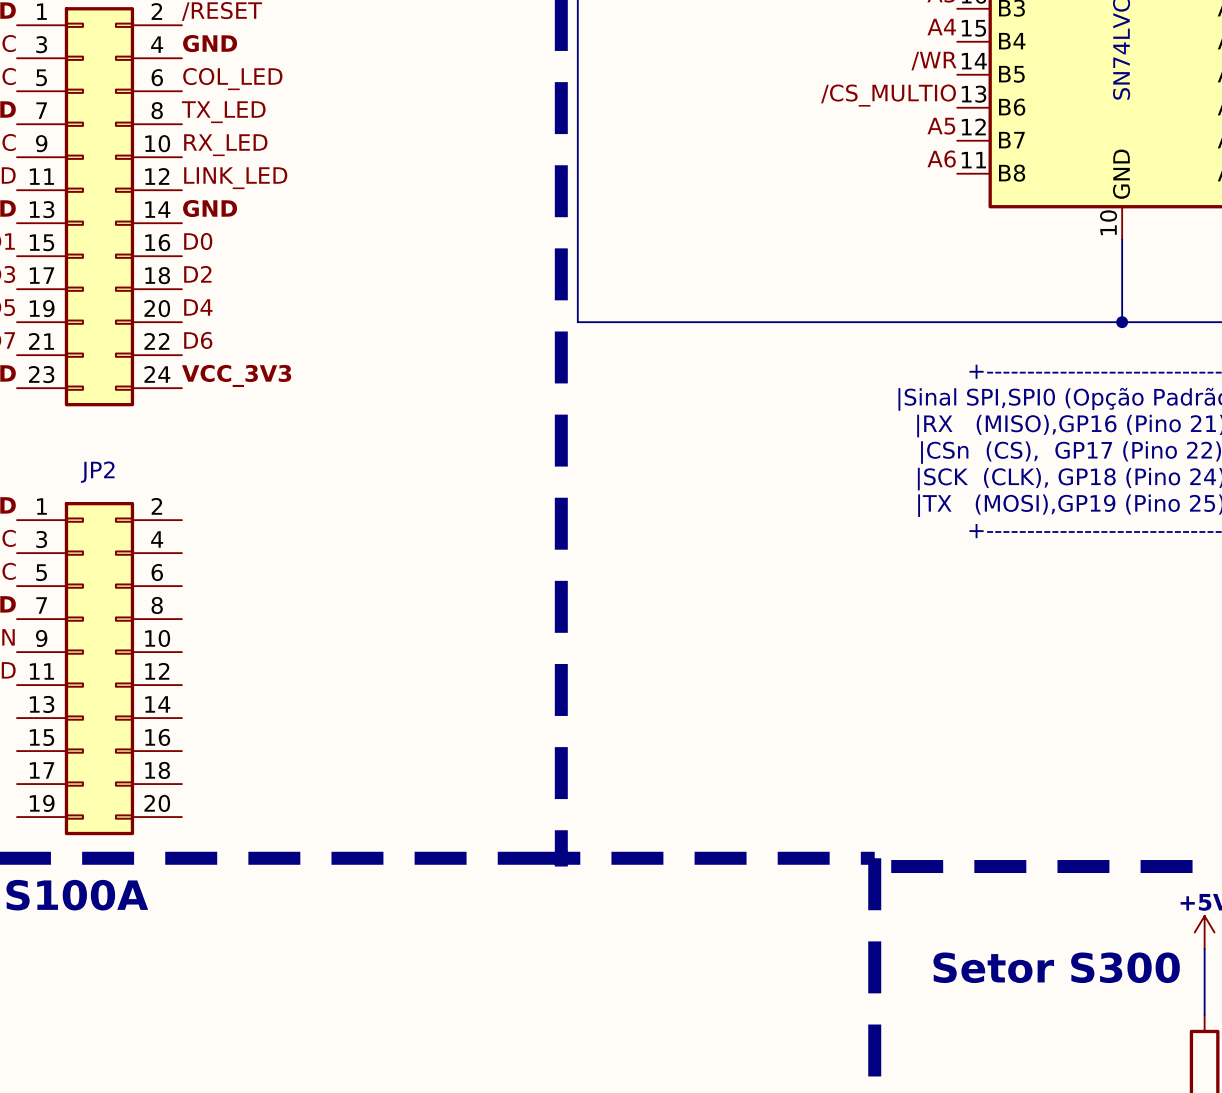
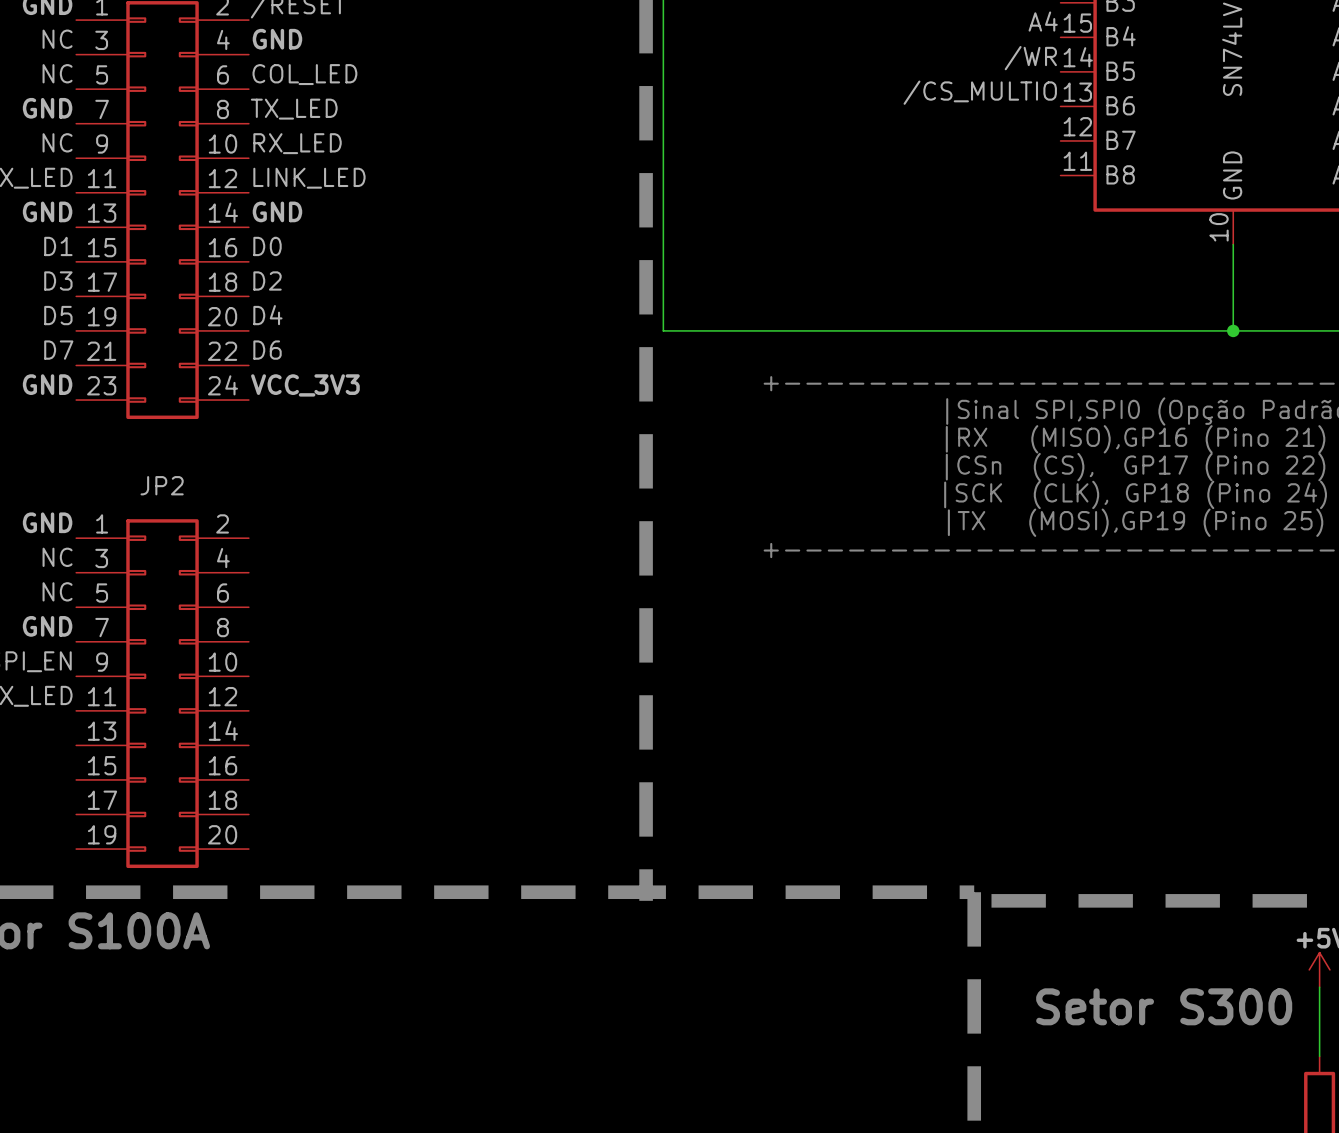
label: A5 (941, 126) -> none
label: A6 (941, 159) -> none

